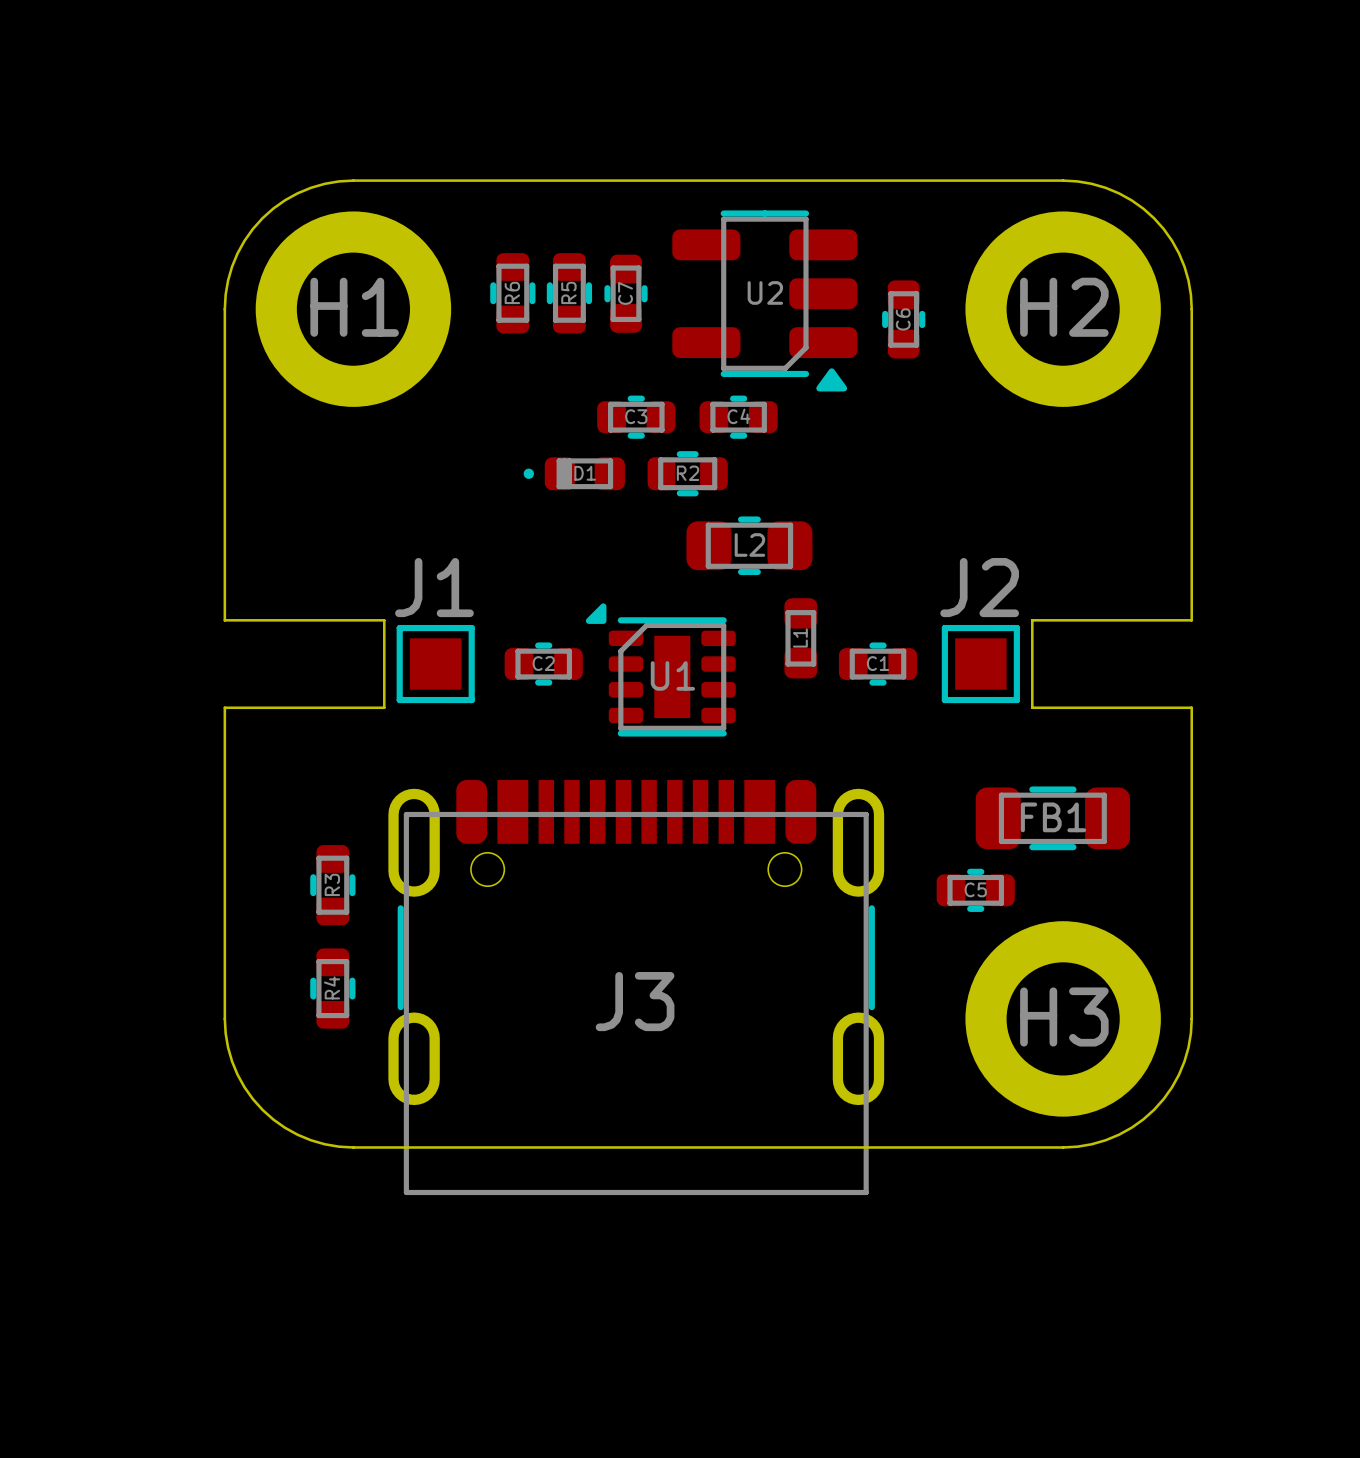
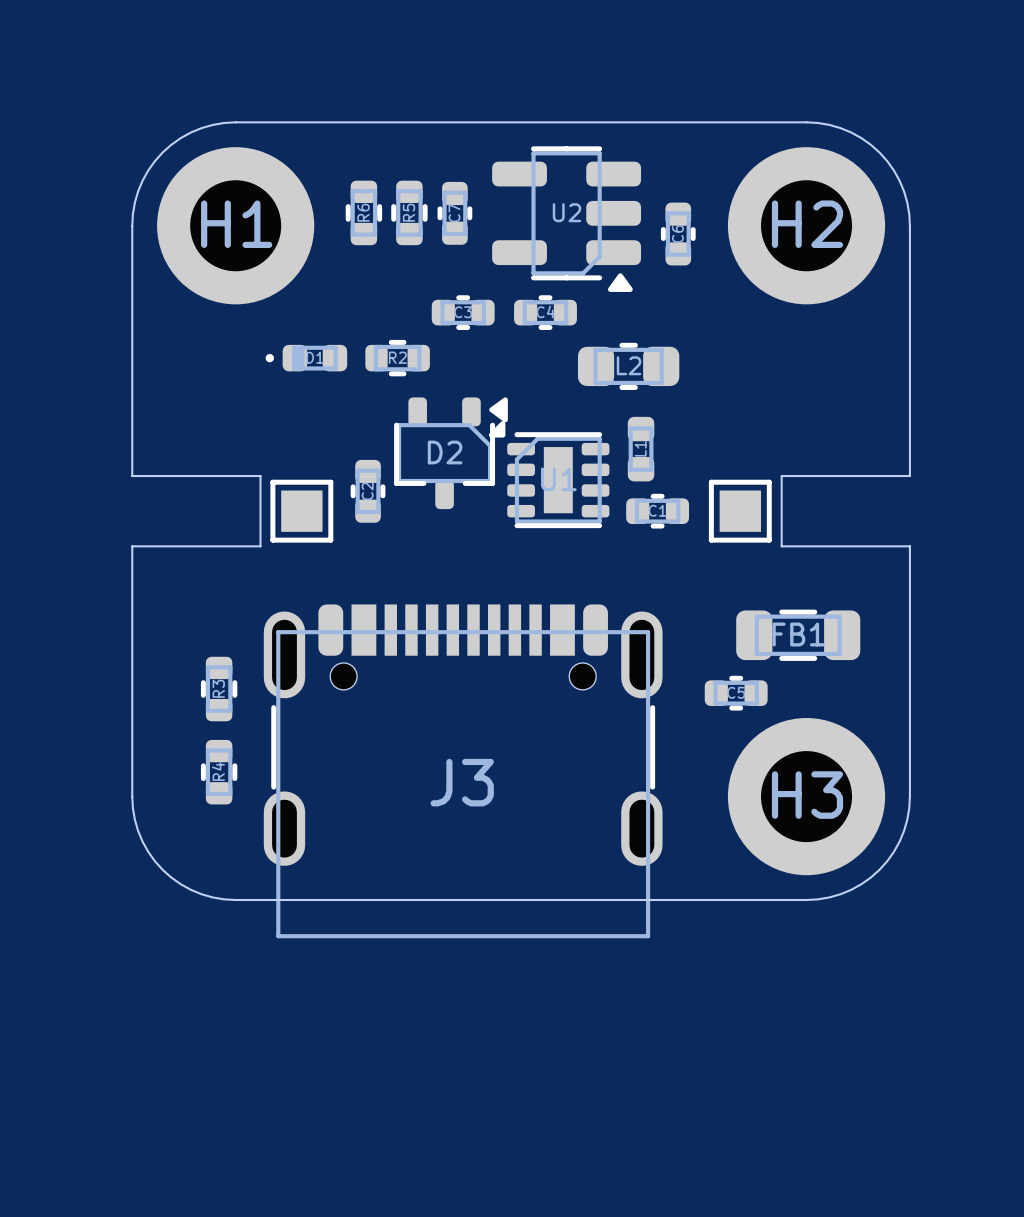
D1 position: (574, 473) -> (306, 358)
R2 position: (687, 473) -> (397, 358)
L2 position: (749, 545) -> (628, 366)
J1 name: J1 (434, 587) -> none
J2 name: J2 (979, 587) -> none
D2: none -> (450, 453)
L1 position: (800, 638) -> (641, 449)
C2 rotation: 0° (543, 664) -> 90° clockwise (368, 491)
U1 position: (660, 669) -> (549, 474)

